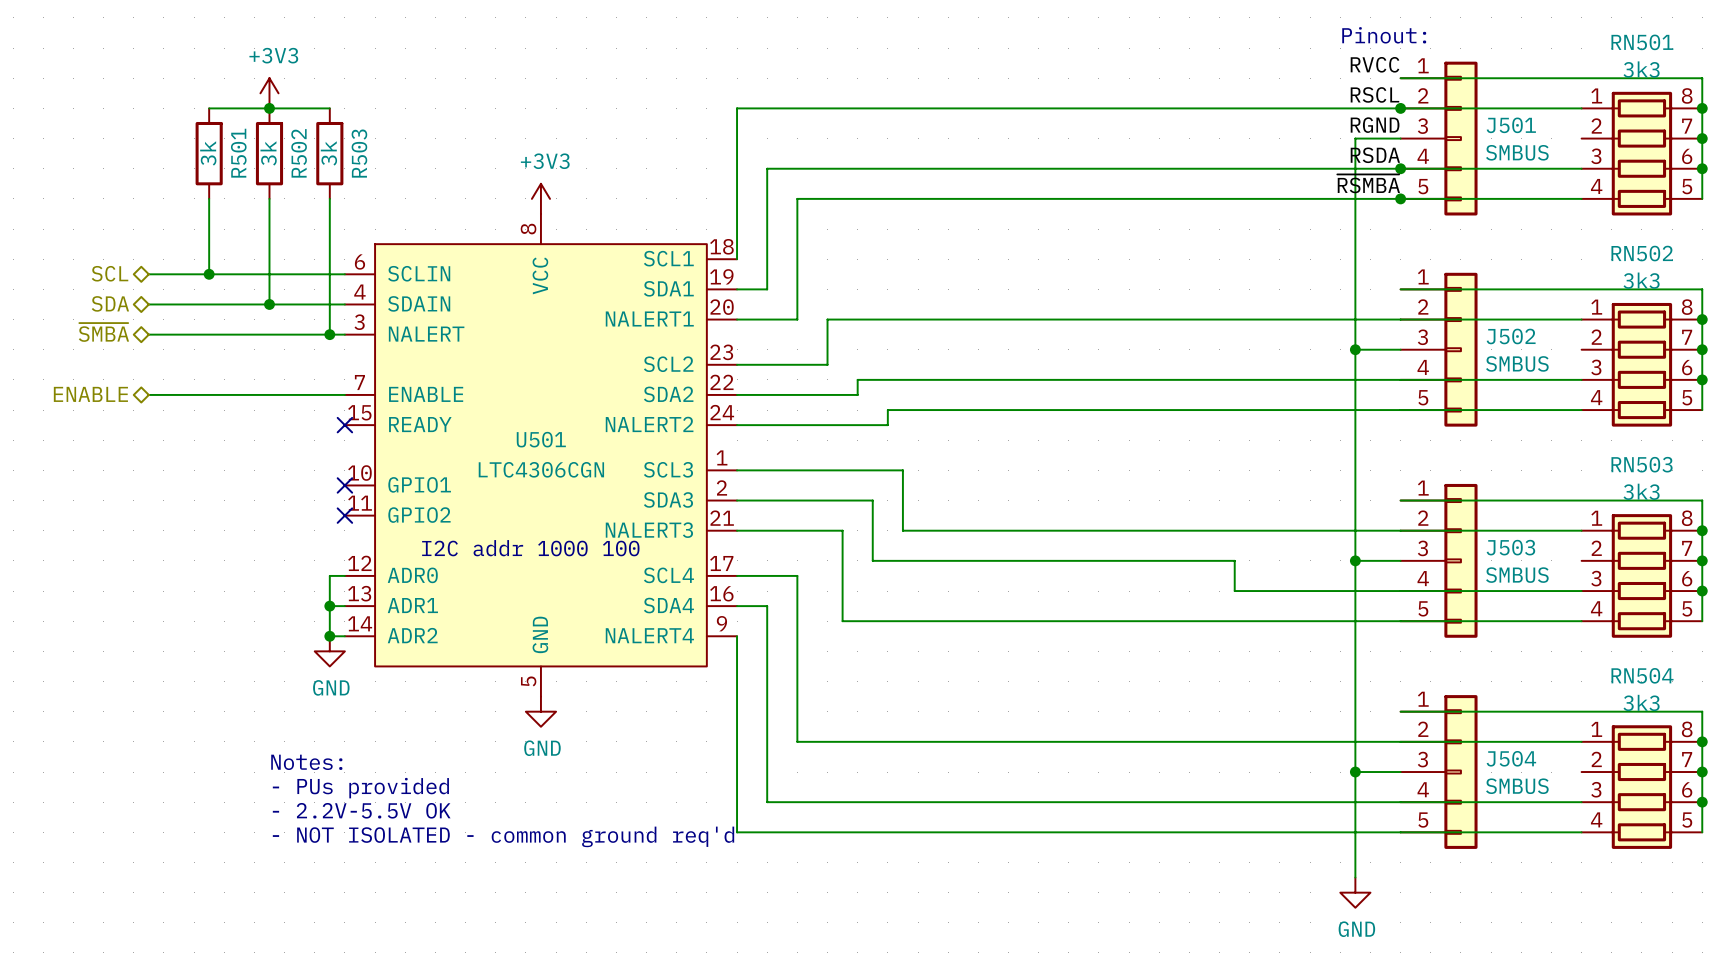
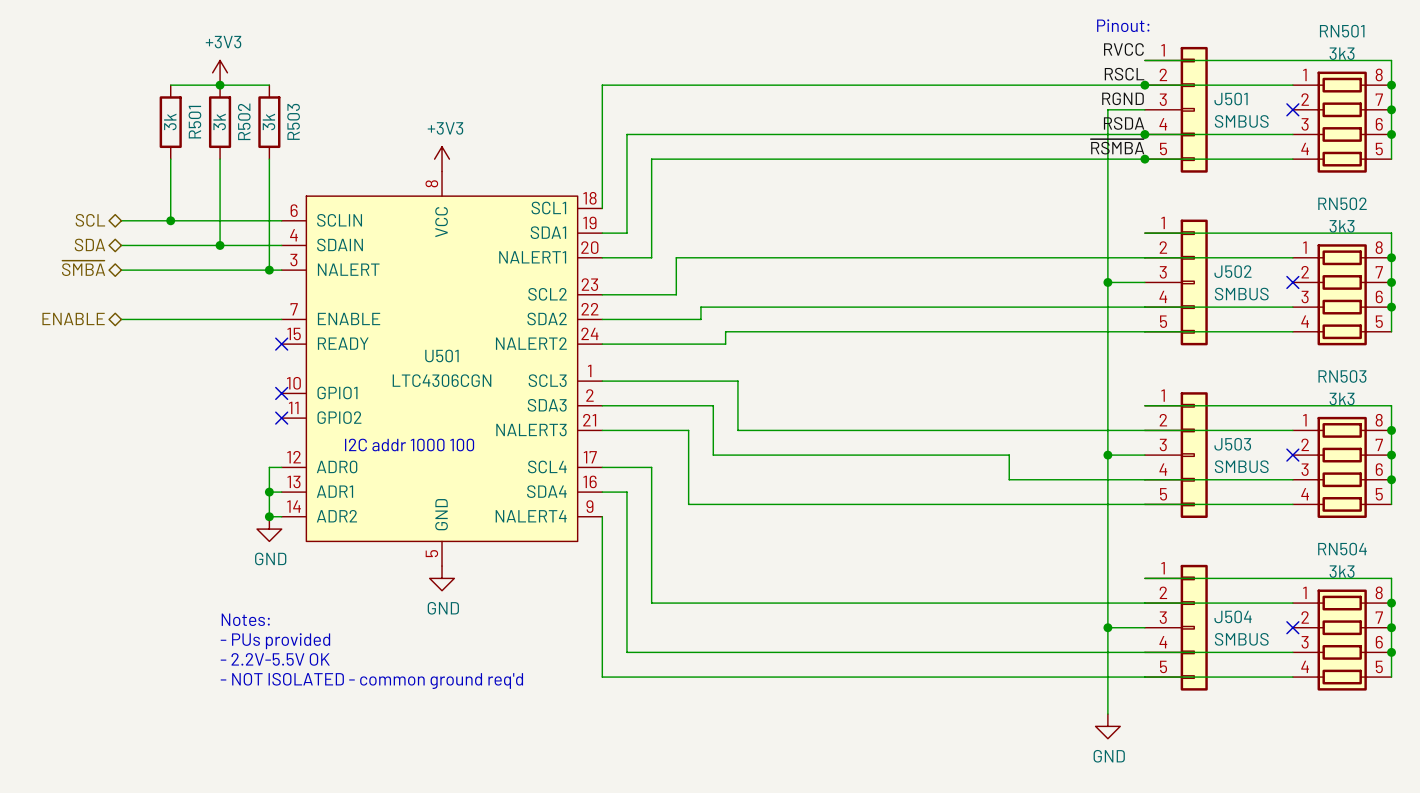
no-connect mark: none -> (1292, 109)
no-connect mark: none -> (1292, 282)
no-connect mark: none -> (1292, 455)
no-connect mark: none -> (1292, 627)

